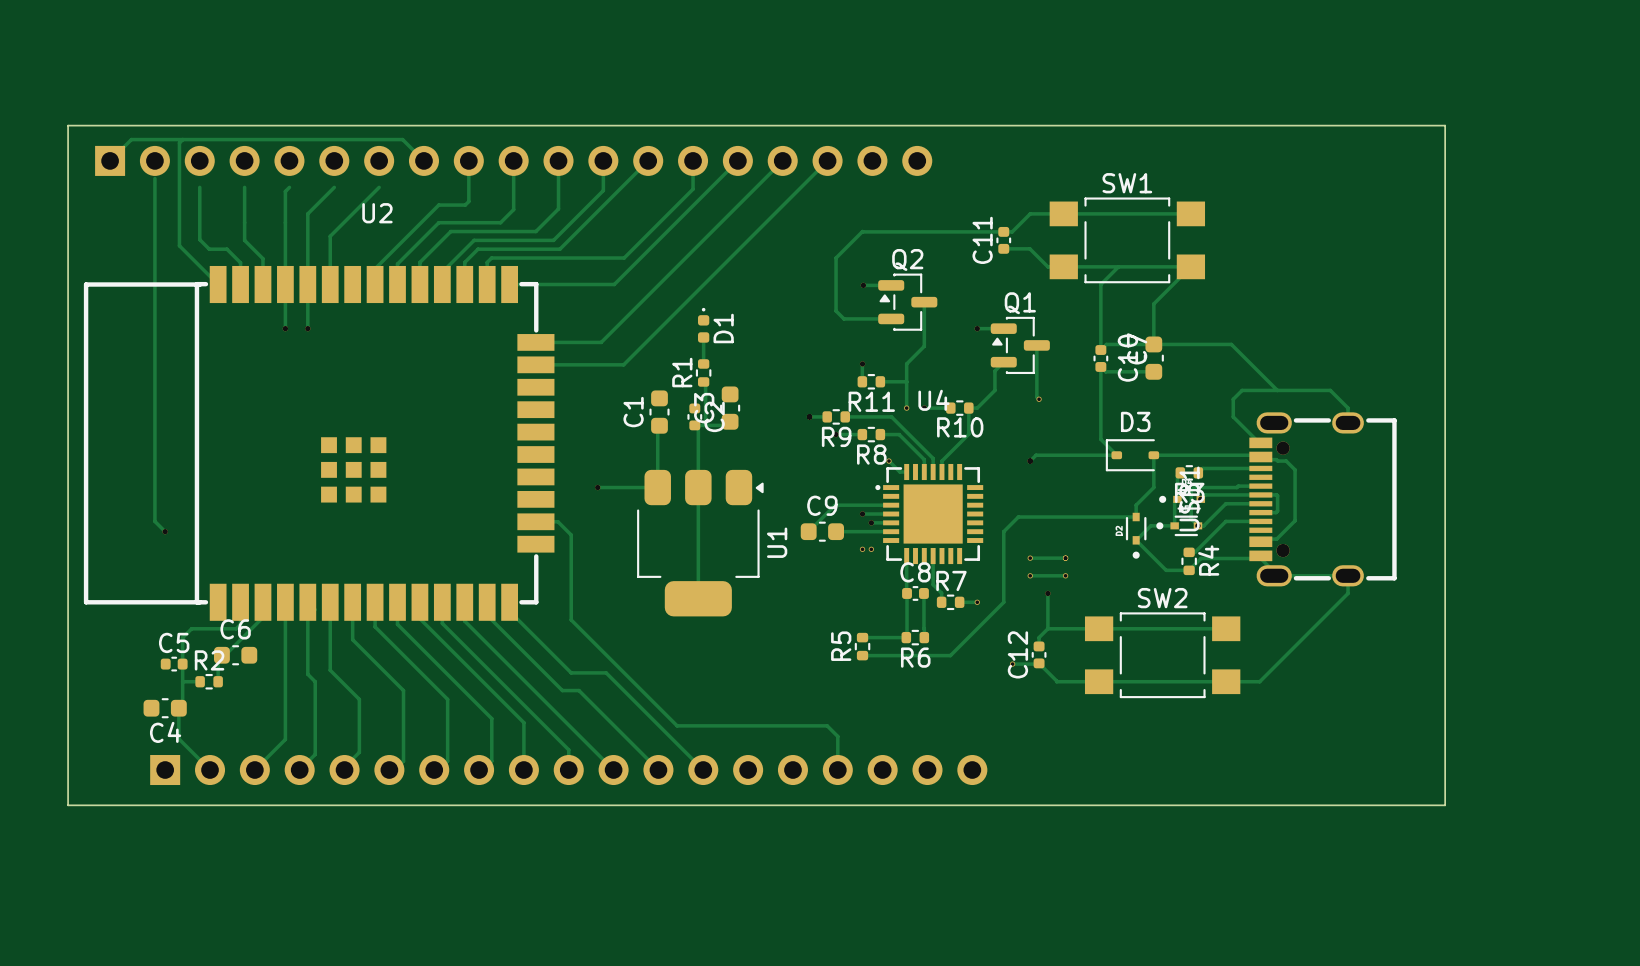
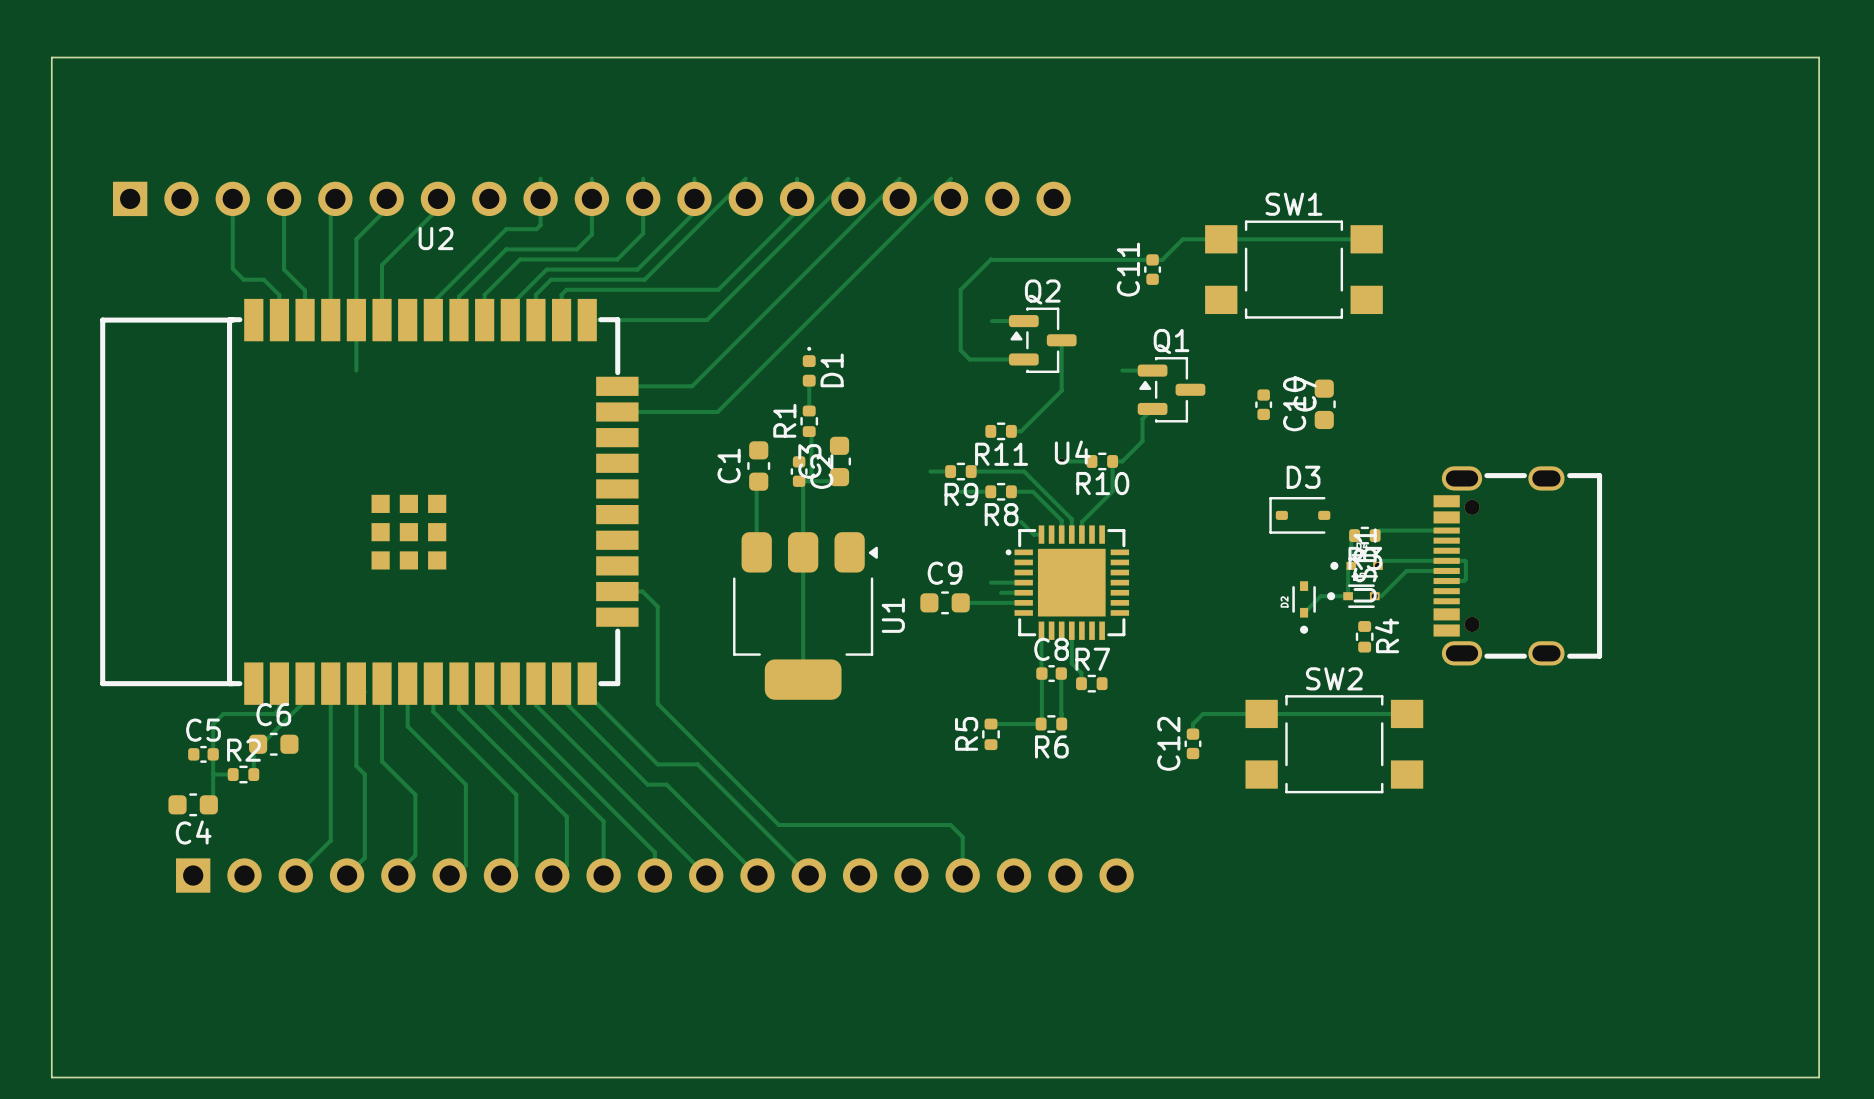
board edge: (68, 125) (1445, 125) (1445, 805) (68, 805) (68, 125) -> (51, 57) (51, 1077) (1819, 1077) (1819, 57) (51, 57)
track: (182, 139) (179, 142) (179, 245) (218, 284) -> none
track: (423, 160) (402, 139) (131, 139) (103, 167) -> none
part position: (513, 160) -> (591, 198)
track: (154, 178) (154, 521) (165, 531) -> none
track: (1003, 248) (1029, 248) (1047, 266) (1190, 266) (1153, 303) (1153, 344) -> none
track: (1118, 266) (1100, 284) (1100, 350) (1106, 344) (1231, 344) (1277, 390) -> none
track: (285, 284) (285, 328) -> none
via: (863, 285) -> none
via: (285, 328) -> none
via: (307, 328) -> none
via: (977, 328) -> none
track: (1036, 345) (1036, 397) (1039, 399) -> none
via: (862, 363) -> none
track: (906, 363) (906, 381) -> (1041, 410) (1021, 431)
track: (862, 364) (862, 381) -> none
track: (1153, 371) (1105, 371) (1100, 366) (1100, 439) (1116, 455) (1036, 455) (1030, 461) -> none
track: (888, 381) (906, 381) -> none
track: (906, 381) (906, 408) -> none
via: (1039, 399) -> none
via: (906, 408) -> none
via: (809, 416) -> none
track: (1348, 422) (1348, 408) (1330, 390) (1242, 390) (1233, 399) (1233, 416) (1256, 440) (1260, 440) -> none
via: (836, 434) -> none
track: (1256, 455) (1153, 455) (1153, 487) (1136, 505) (1136, 517) (1018, 517) (1003, 531) (1003, 602) (950, 655) (862, 655) -> none
track: (1260, 459) (1286, 461) (1295, 469) (1295, 520) (1276, 539) (1260, 539) -> none
via: (889, 461) -> none
via: (1030, 461) -> none
track: (1260, 486) (1194, 487) (1191, 490) (1191, 519) (1197, 525) -> none
track: (597, 487) (657, 487) -> none
via: (597, 487) -> none
track: (891, 505) (835, 505) (808, 531) -> none
via: (862, 514) -> none
track: (1260, 521) (1225, 521) (1194, 552) (1189, 552) -> none
via: (871, 522) -> none
via: (165, 531) -> none
track: (1136, 540) (1166, 570) (1189, 570) (1200, 558) (1260, 558) (1274, 571) (1274, 575) (1348, 575) (1348, 593) (1259, 681) (1056, 681) (1039, 663) (1012, 664) -> none
via: (862, 549) -> none
via: (871, 549) -> none
track: (1030, 558) (1065, 558) -> none
via: (1030, 558) -> none
via: (1065, 558) -> none
track: (1030, 575) (1065, 575) -> none
via: (1030, 575) -> none
via: (1065, 575) -> none
track: (1047, 593) (1047, 628) -> none
via: (1047, 593) -> none
track: (959, 602) (977, 602) -> none
via: (977, 602) -> none
via: (1012, 664) -> none
track: (178, 708) (178, 738) (210, 770) -> none

